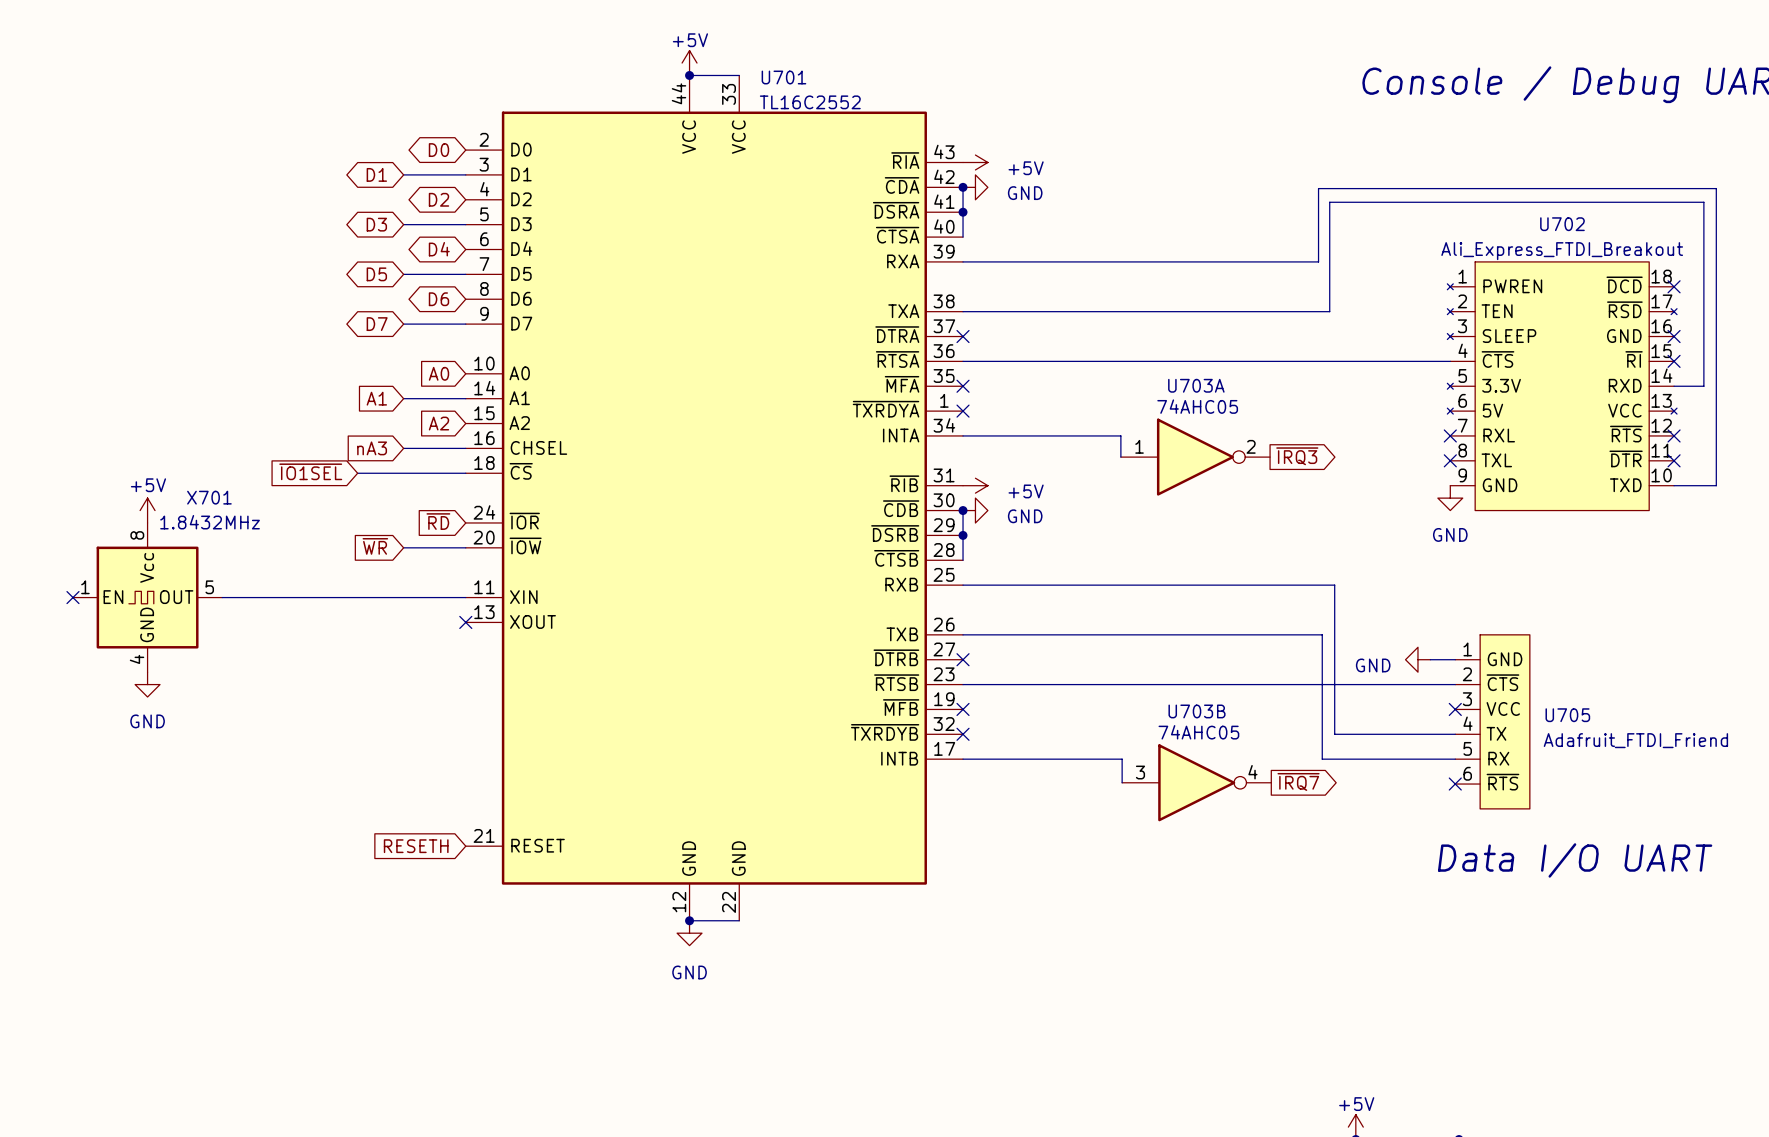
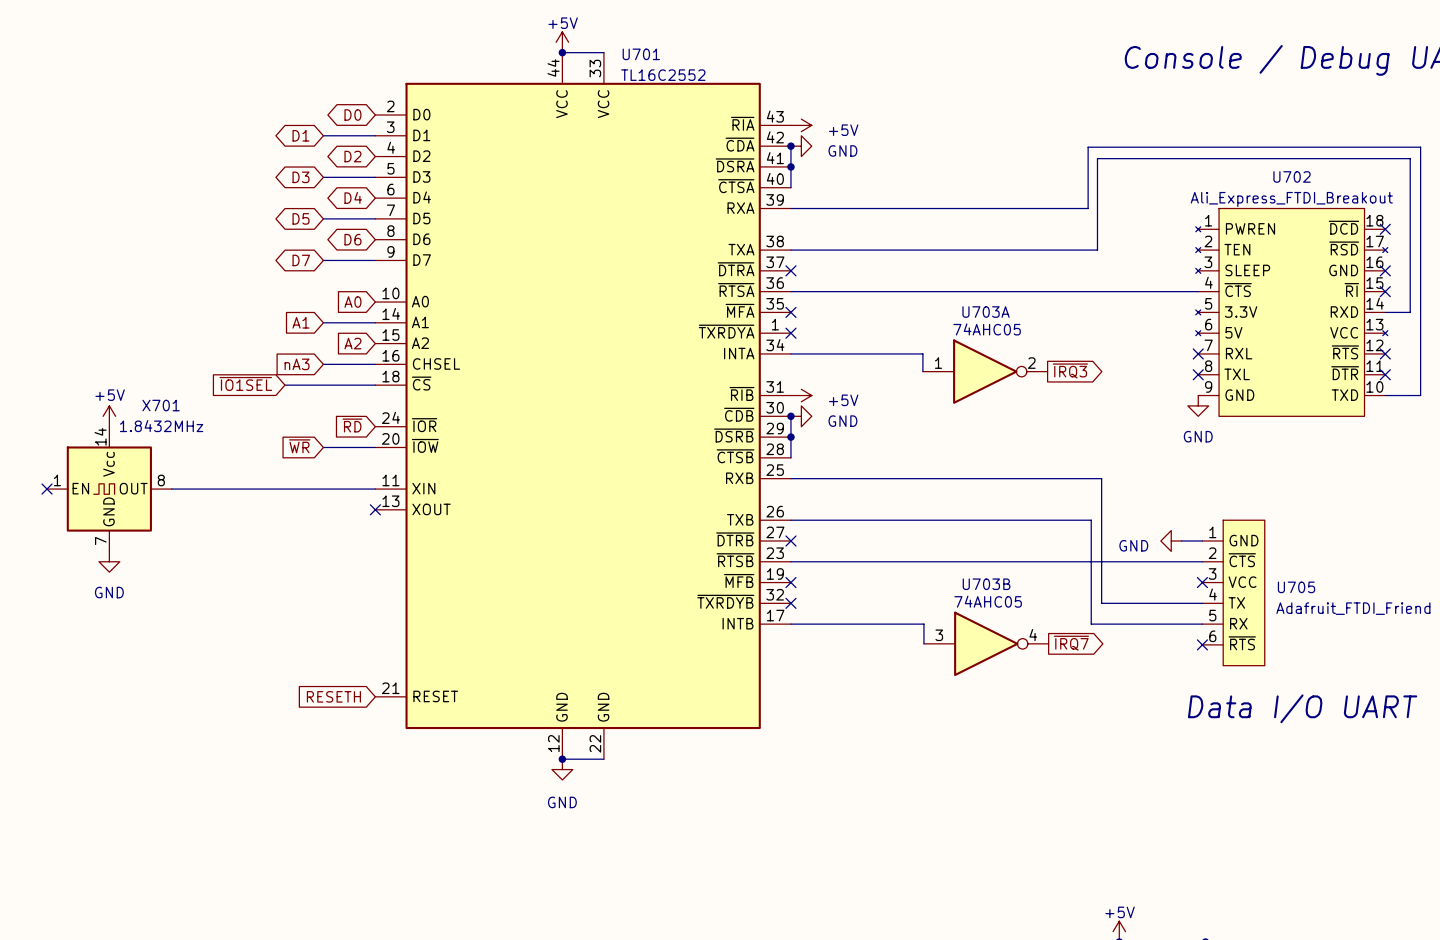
X701 pin number: 8 (137, 535) -> 14 (100, 436)
X701 pin number: 5 (209, 587) -> 8 (161, 480)
X701 pin number: 4 (137, 659) -> 7 (100, 540)

